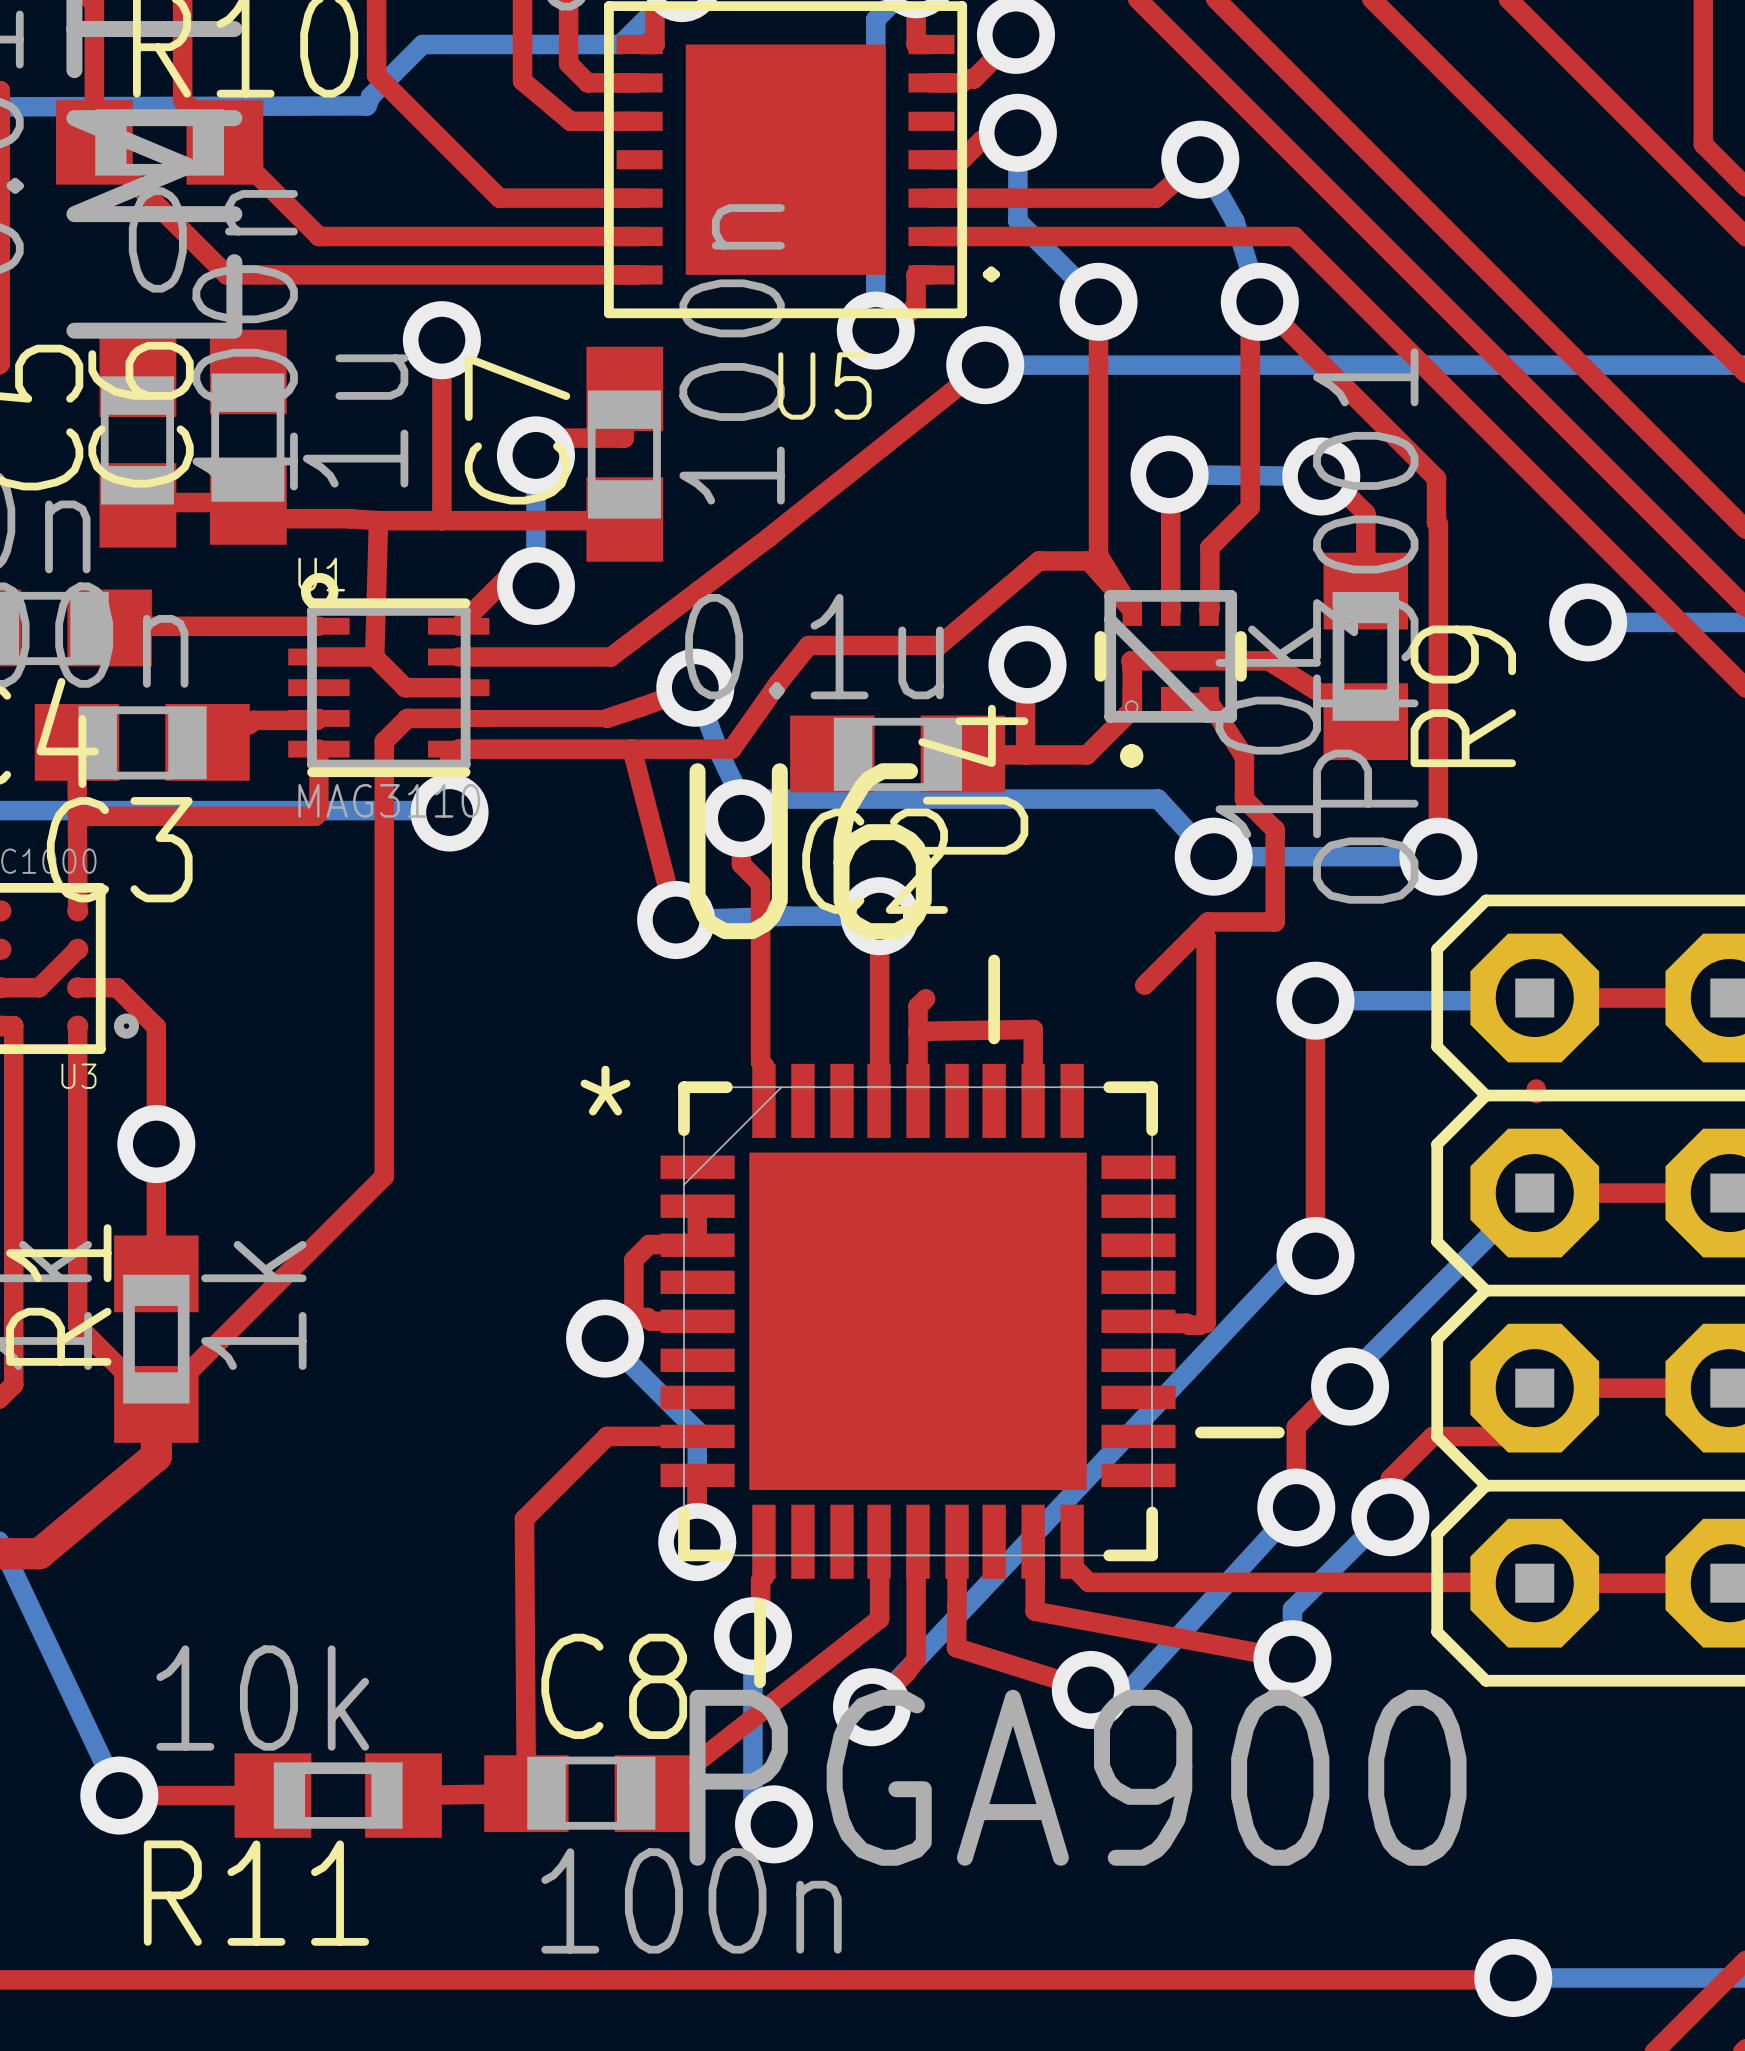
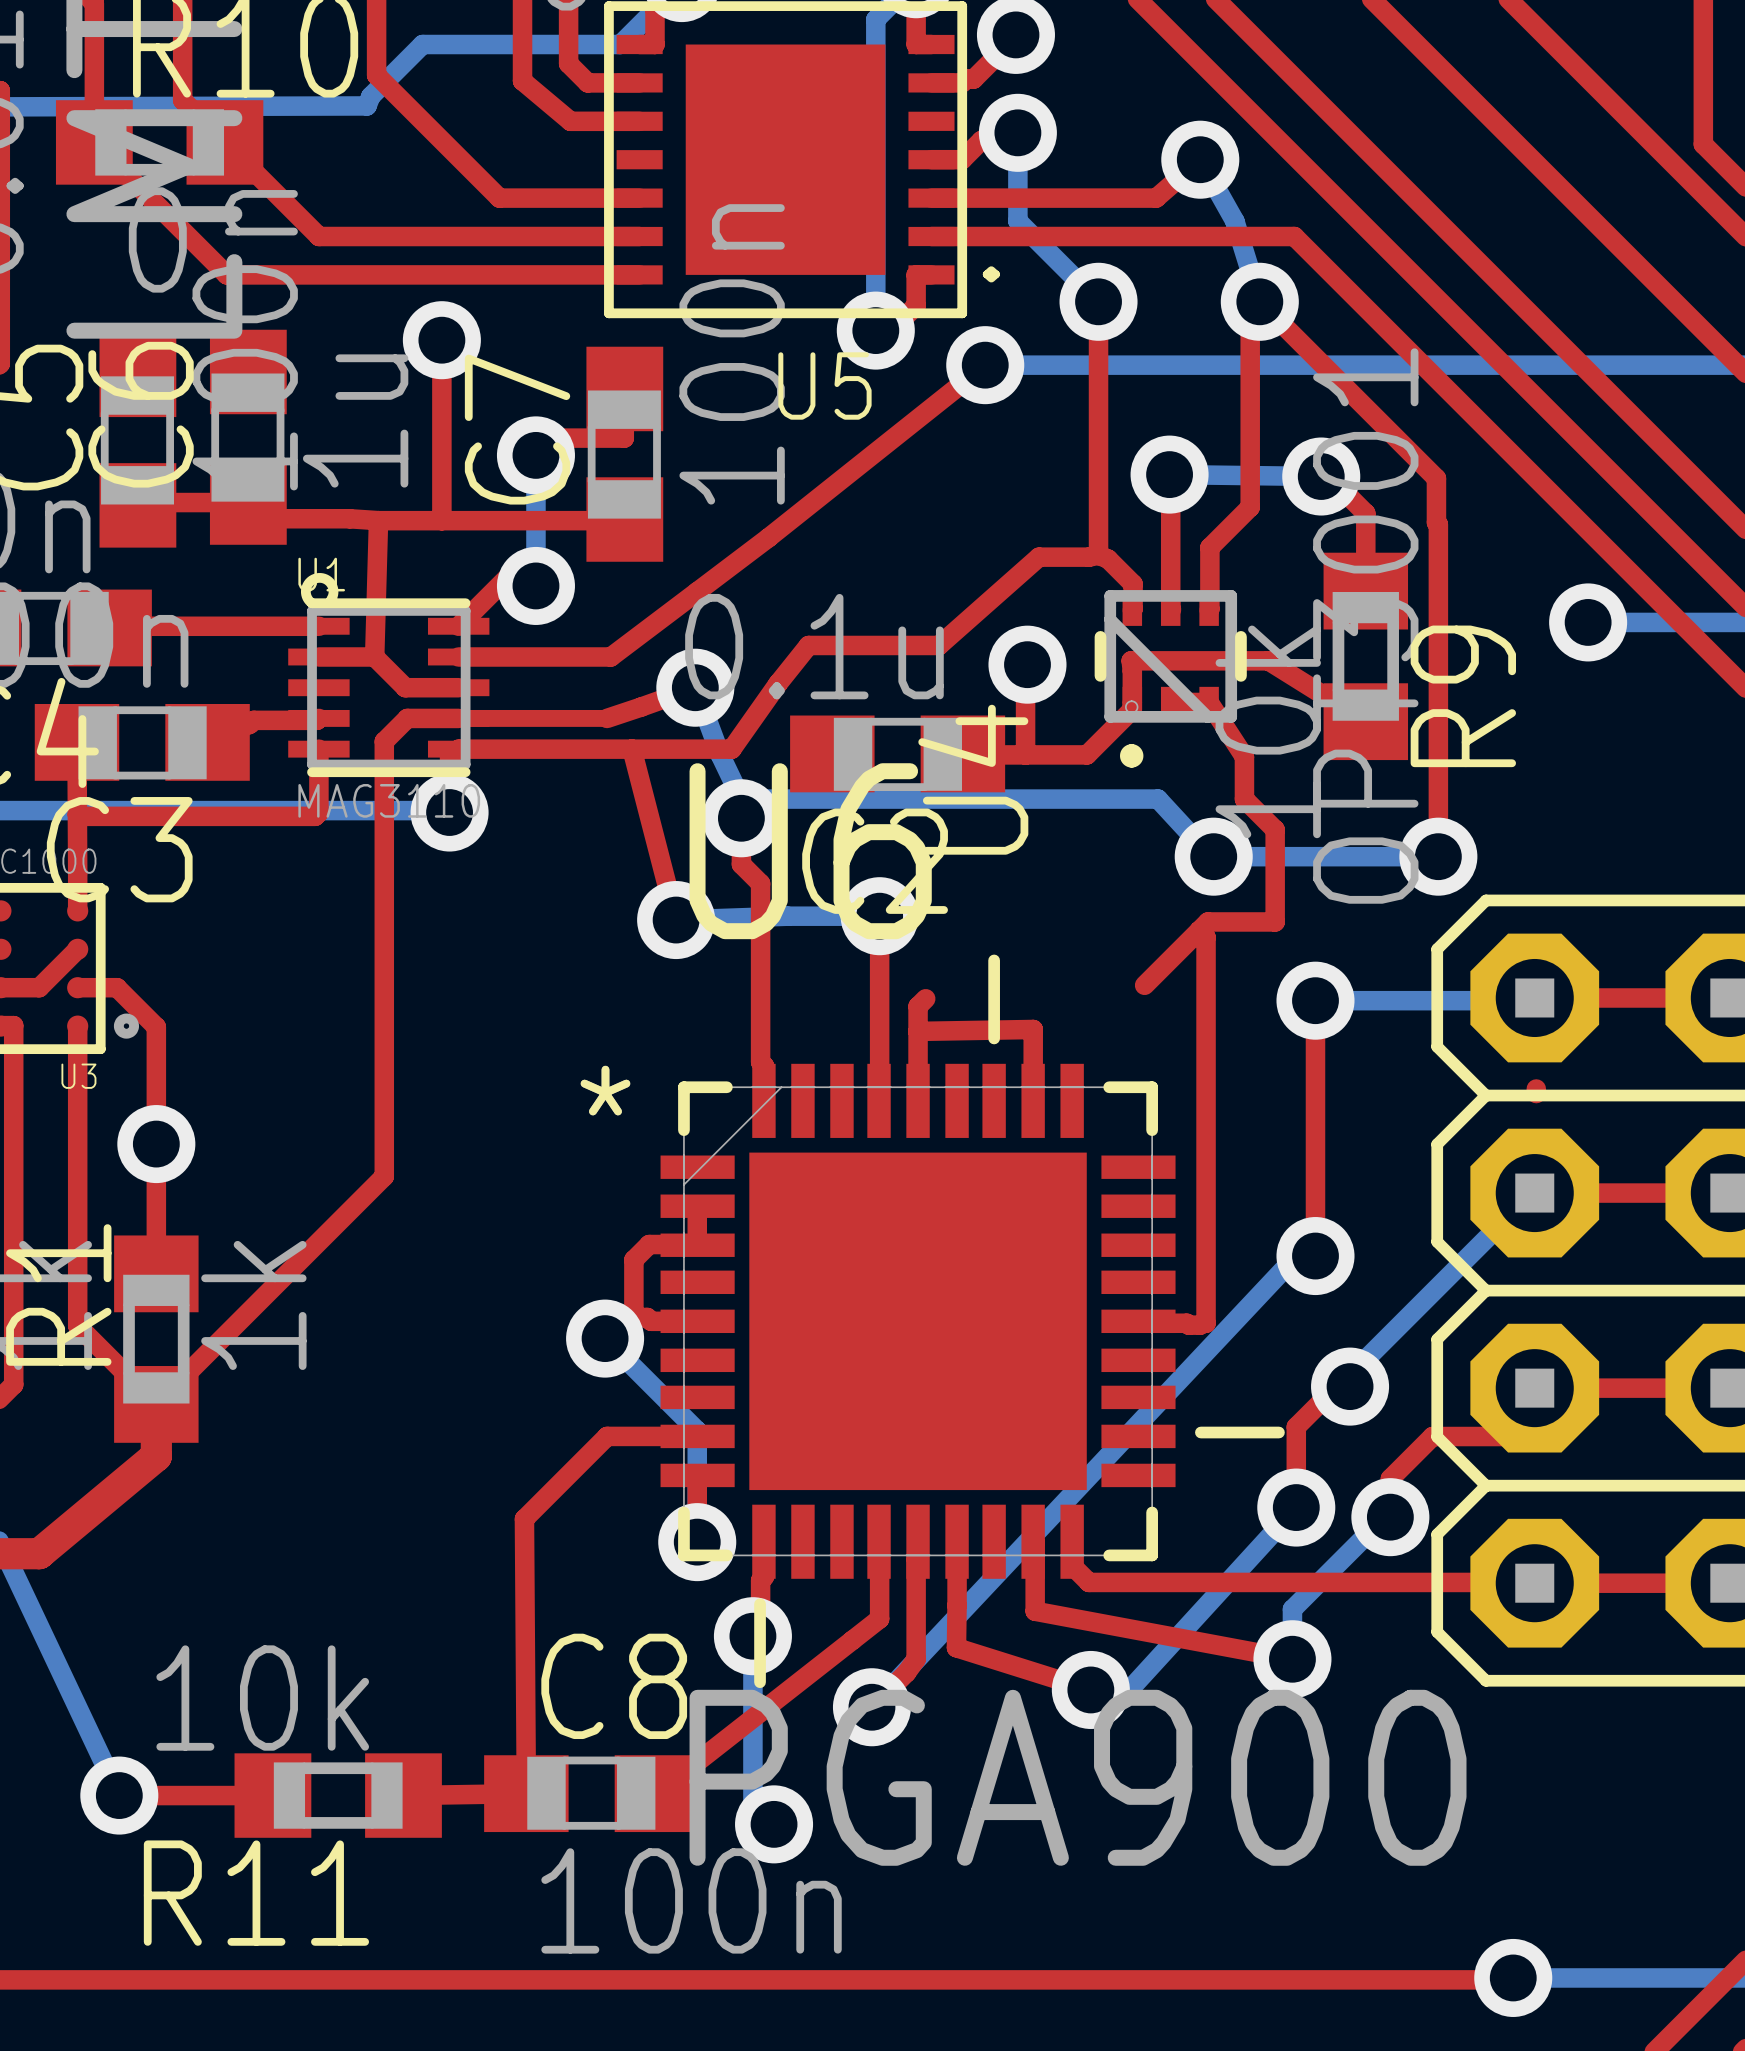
top track: (1098, 555) (1132, 610) (1088, 560) (1039, 560) (939, 645) -> (1133, 608) (1133, 584) (1108, 559) (1098, 555) (1088, 557) (1039, 557) (939, 645)

